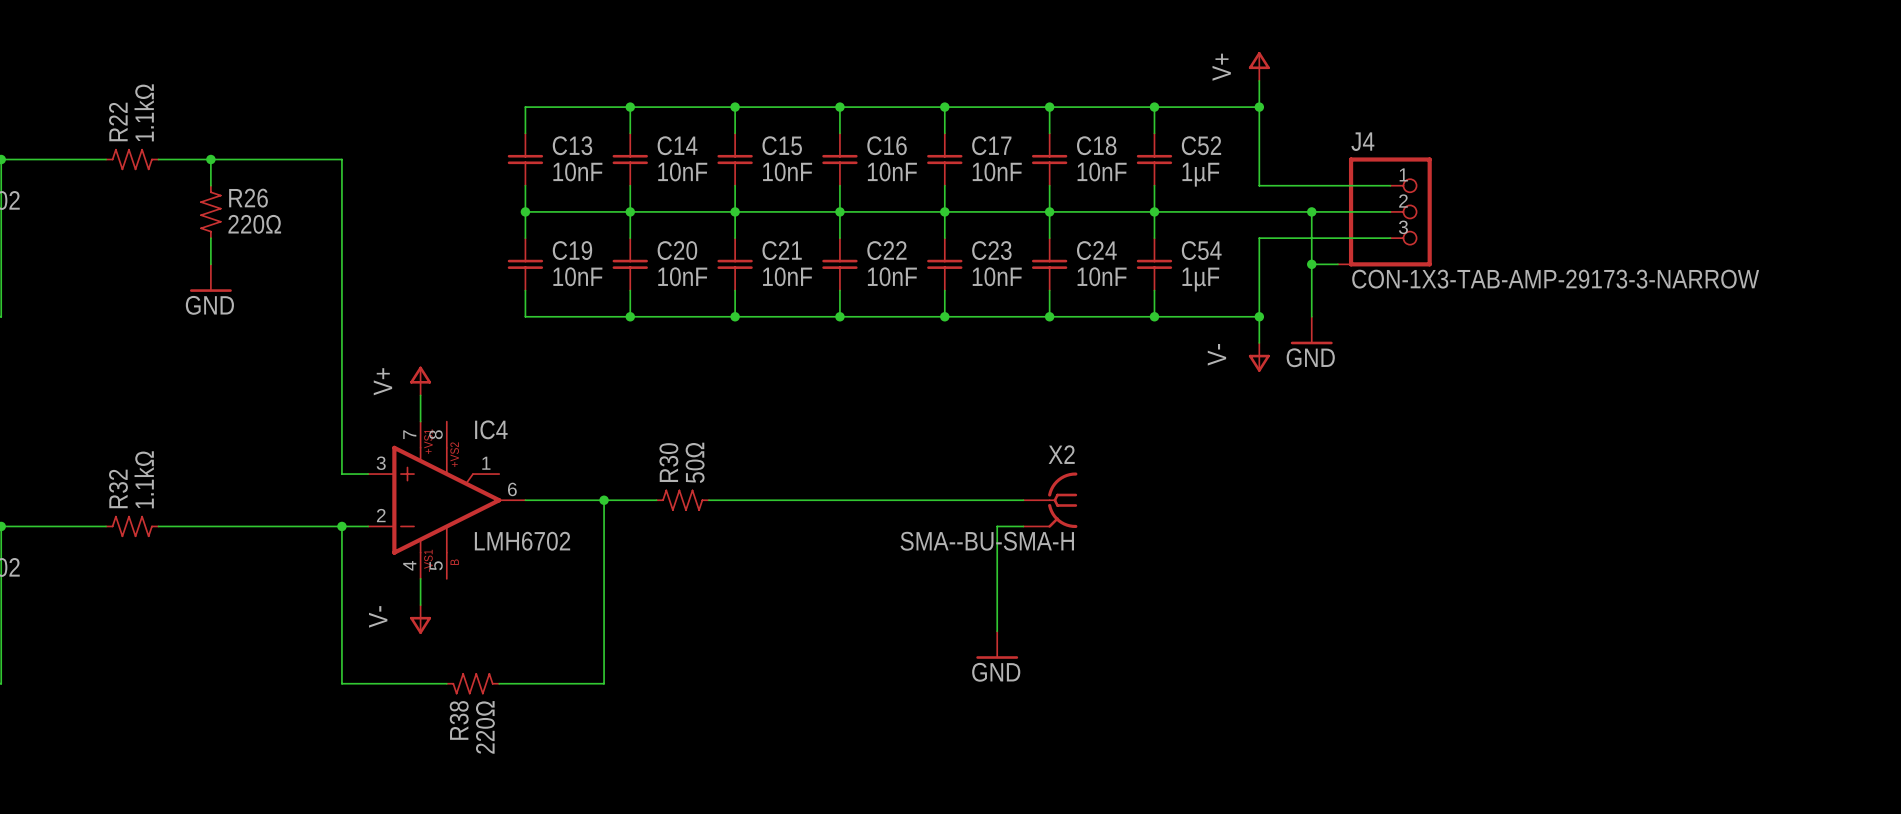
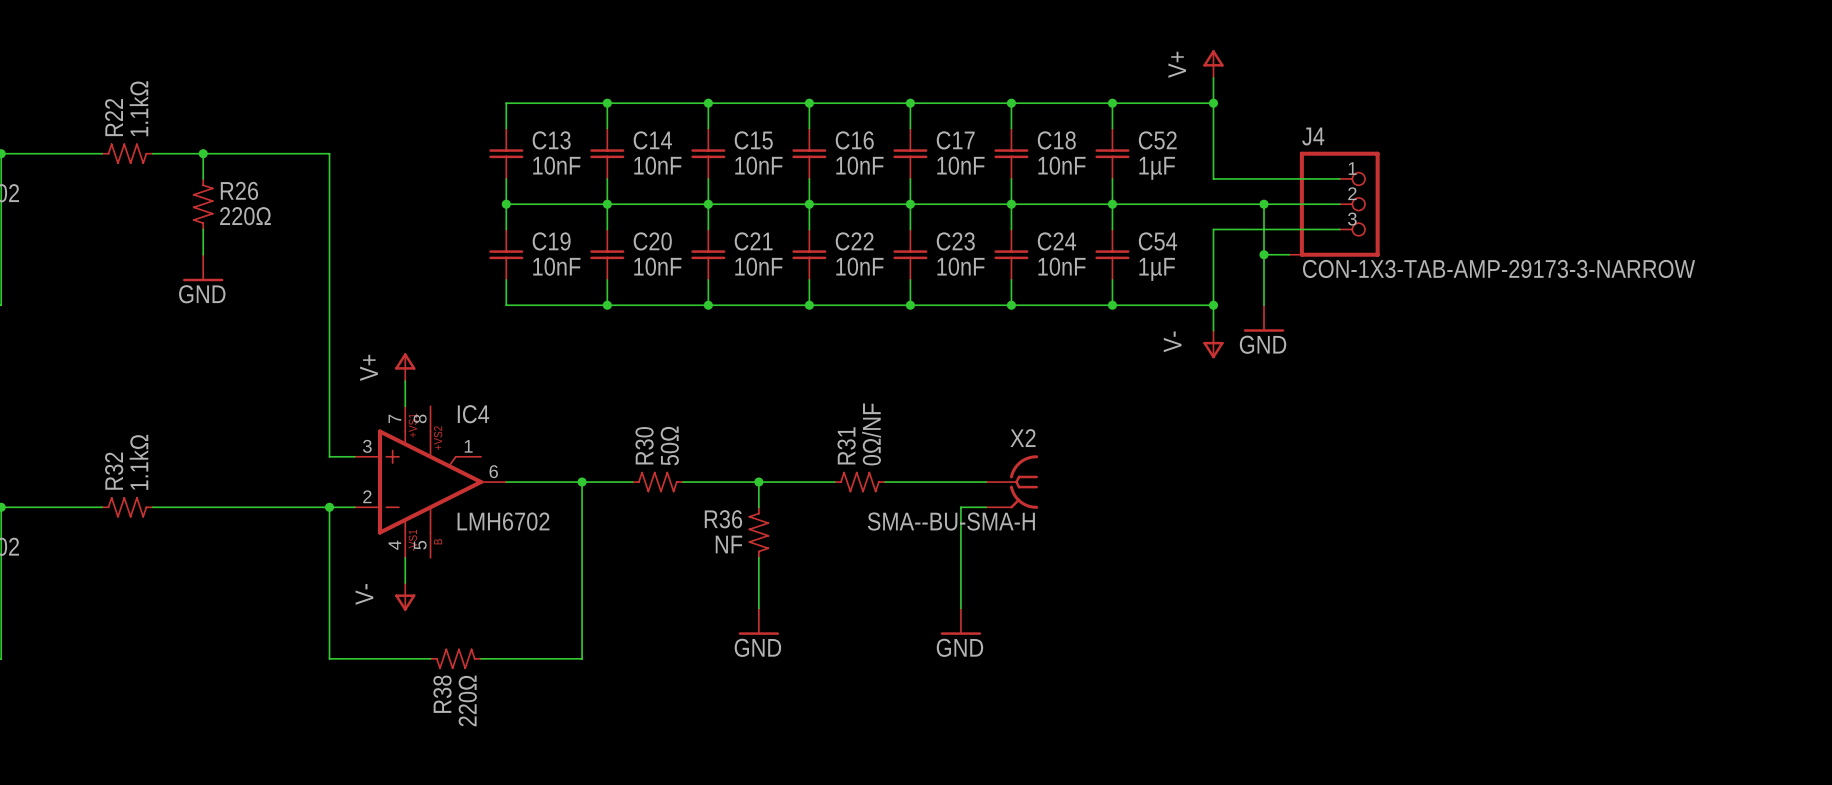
wire: none -> (758, 482) (758, 507)
junction: none -> (758, 482)
wire: (866, 500) (918, 500) -> none
R31: none -> 0Ω/NF (859, 482)
R36: none -> NF (758, 532)
wire: none -> (758, 557) (758, 608)
power symbol: none -> GND (758, 621)

